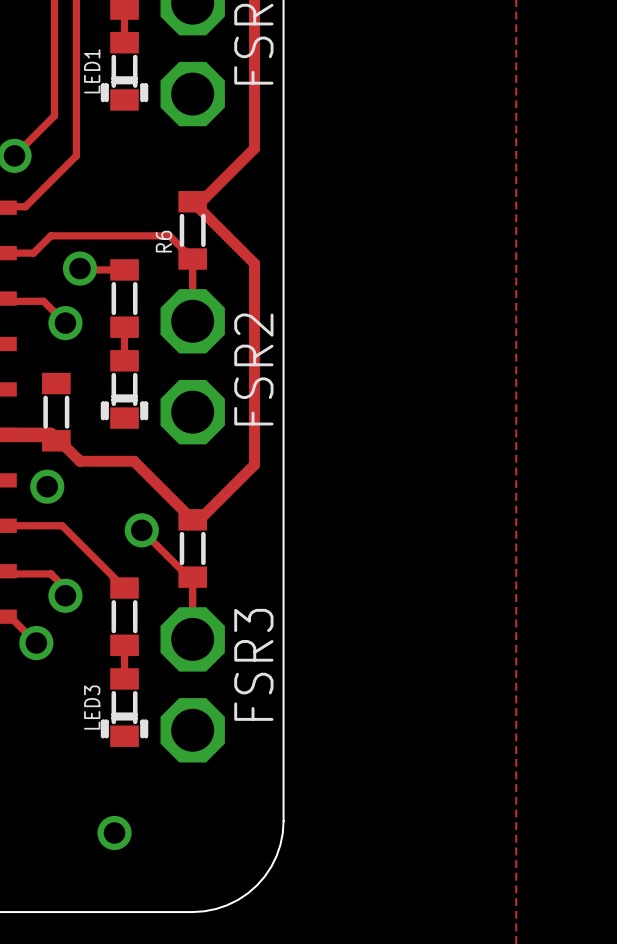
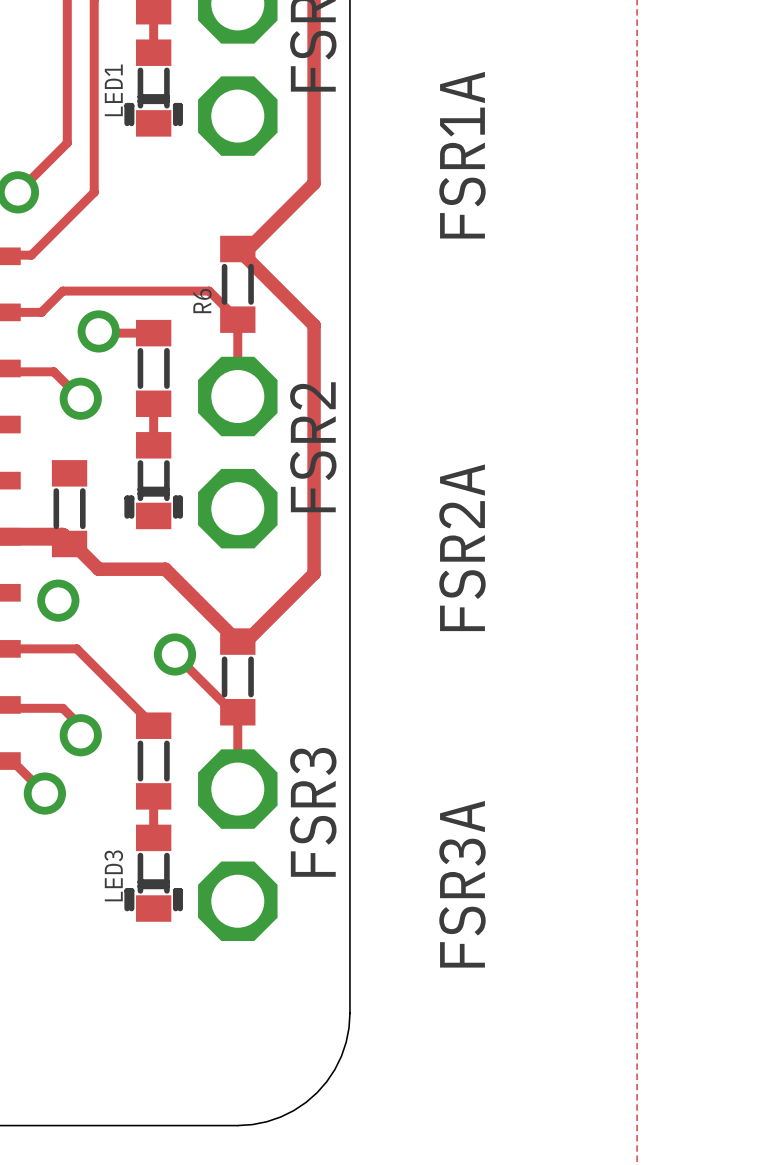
FSR1A name: none -> FSR1A (462, 155)
FSR2A name: none -> FSR2A (462, 547)
FSR3A name: none -> FSR3A (462, 884)
via: (114, 832) -> none

